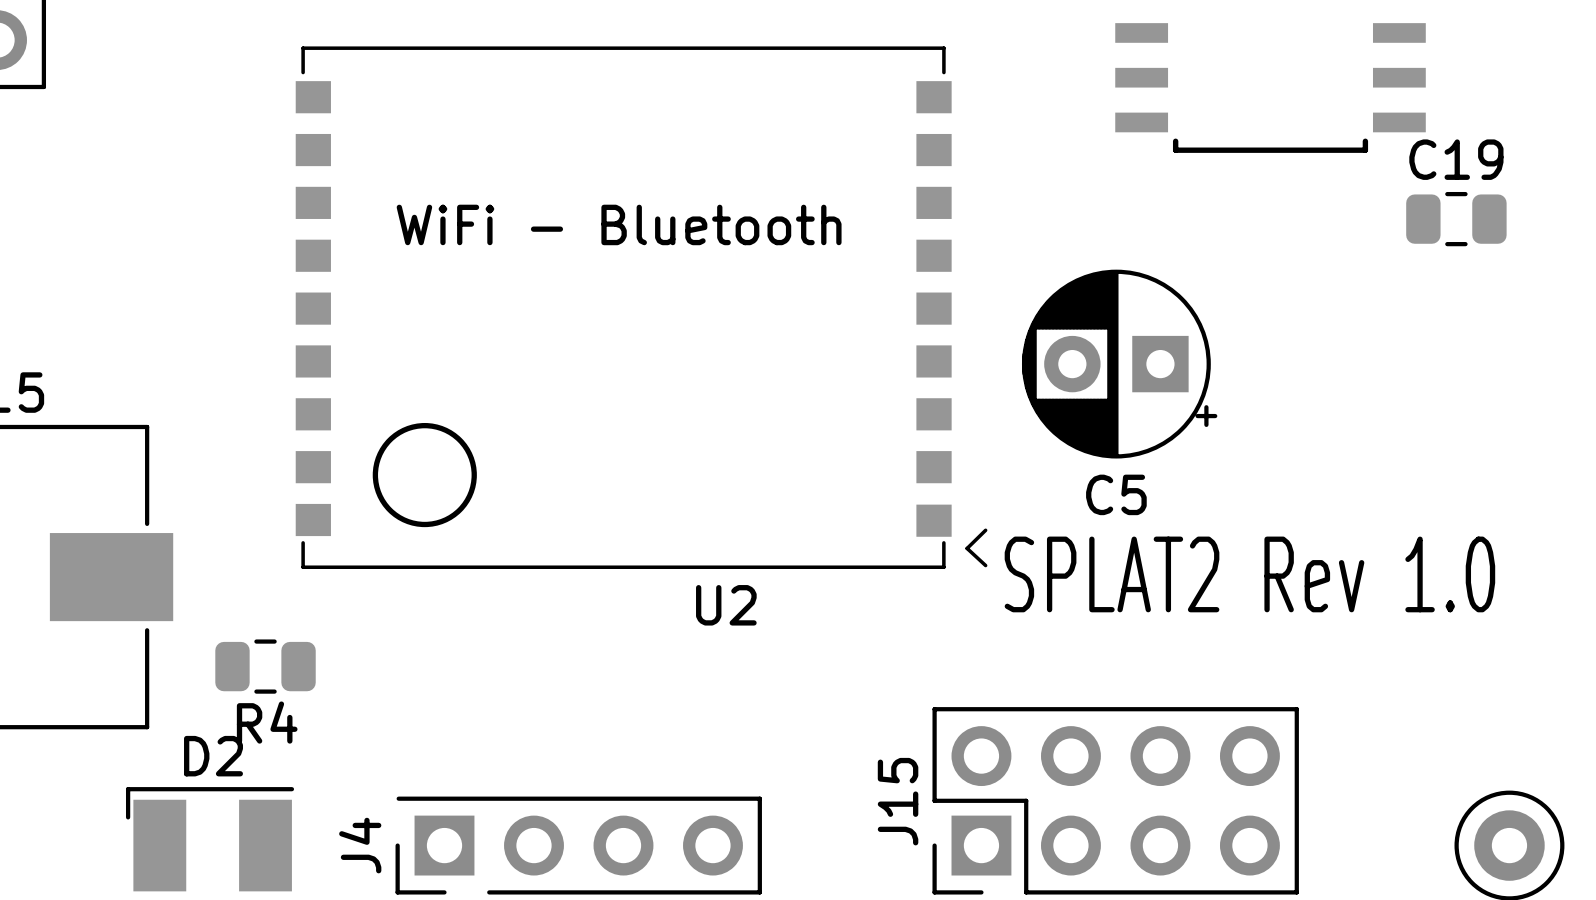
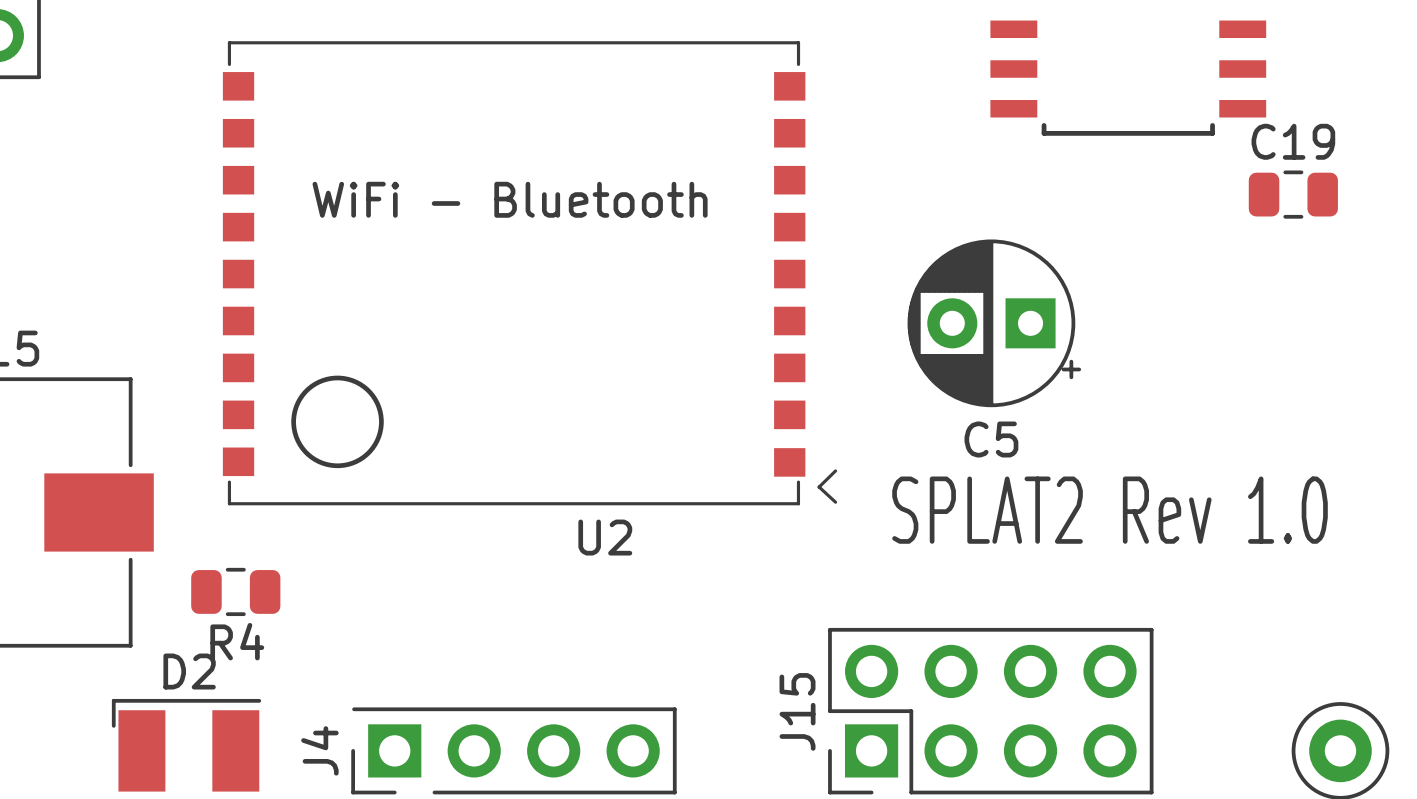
U2 position: (641, 307) -> (530, 273)

